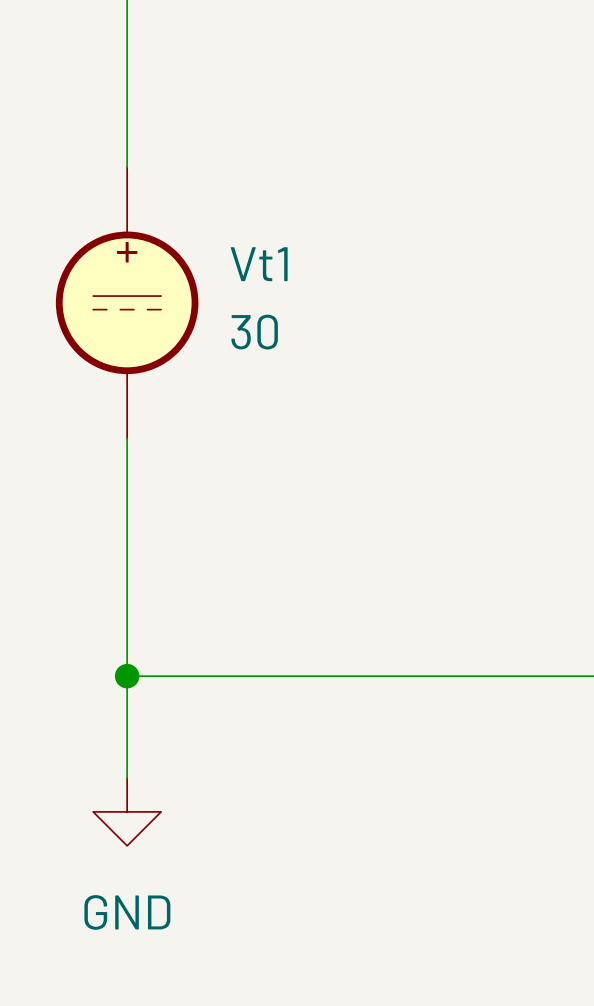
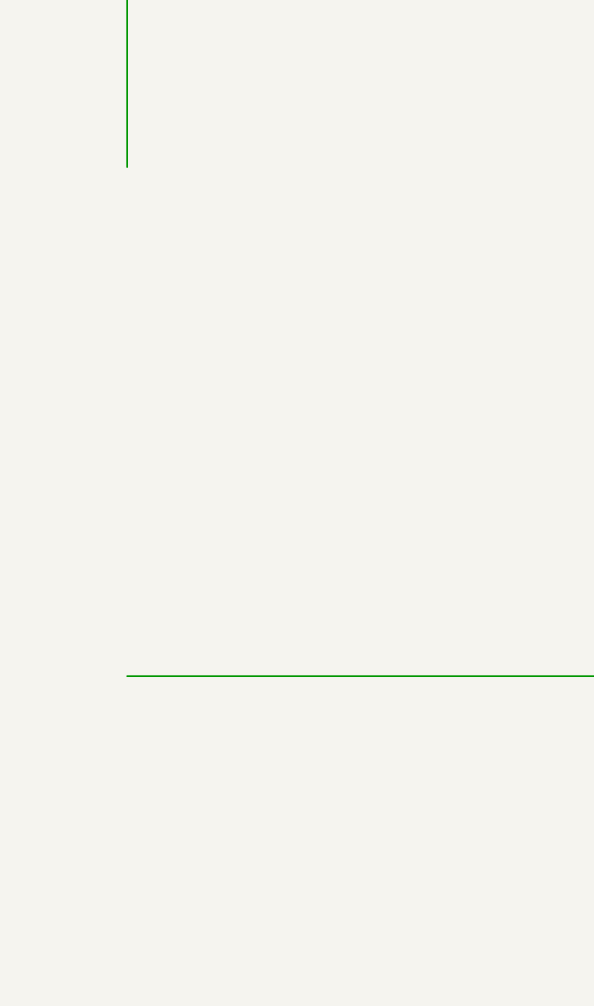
Vt1: 30 (127, 302) -> none
wire: (127, 438) (127, 777) -> none
junction: (127, 676) -> none
power symbol: GND (127, 811) -> none

